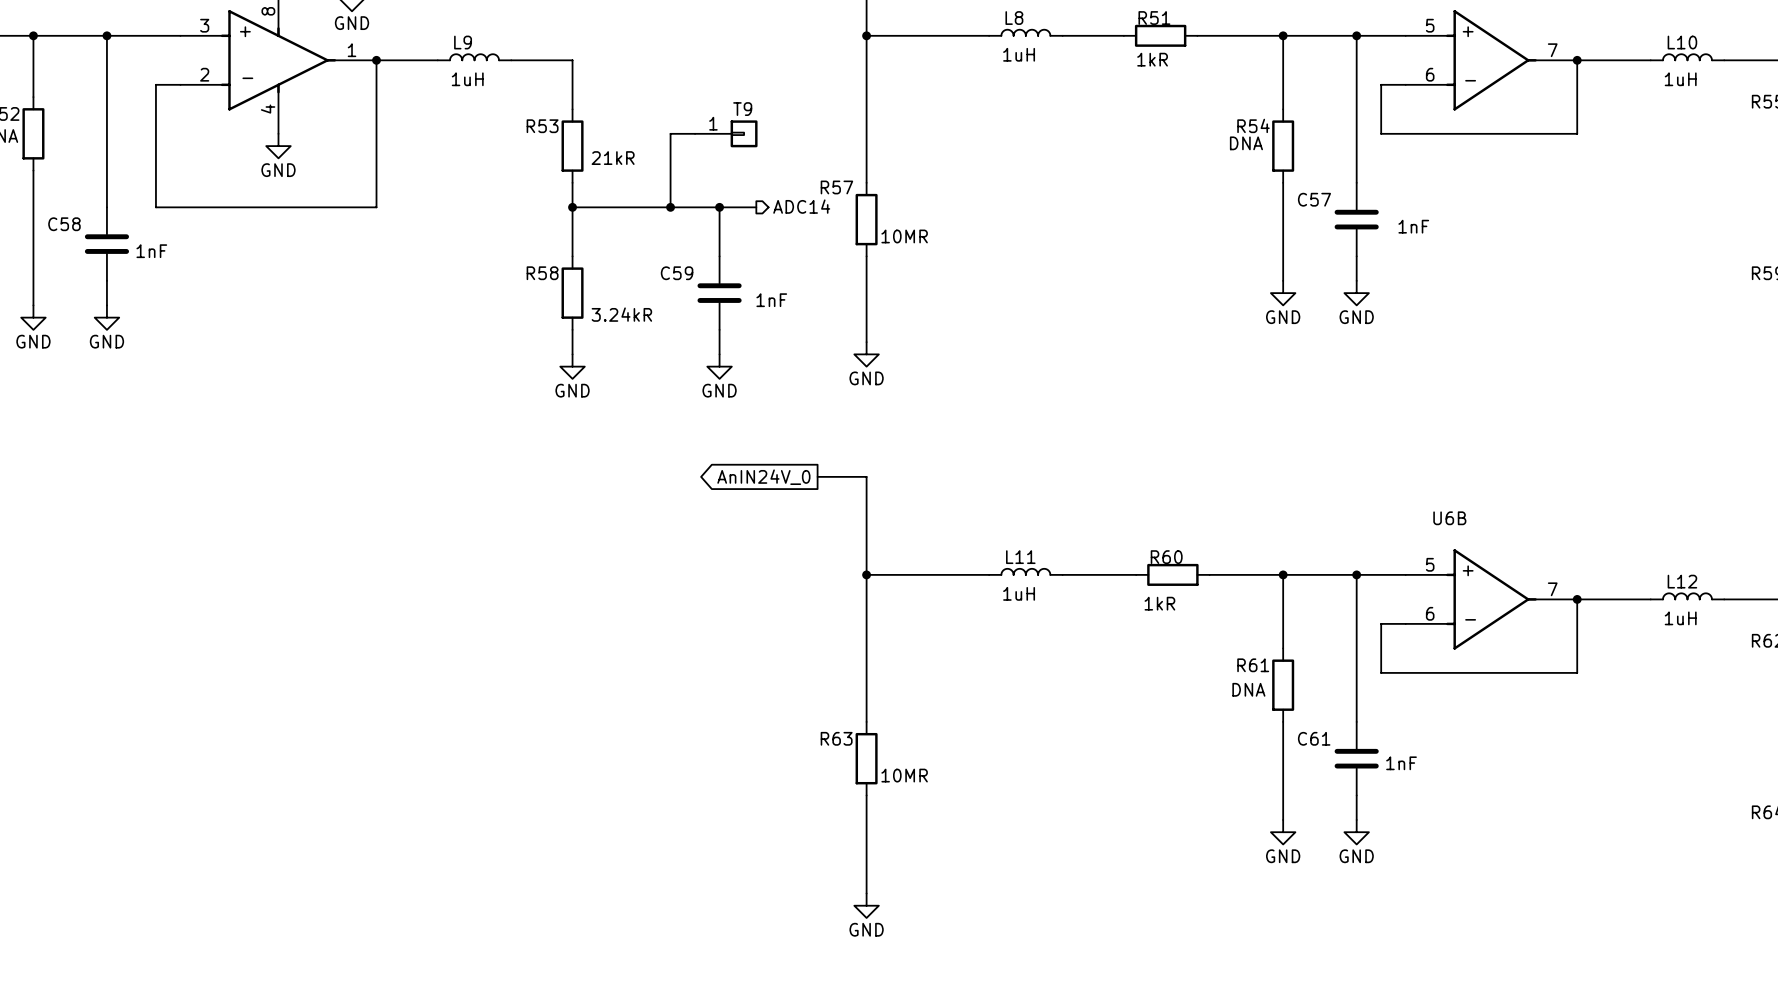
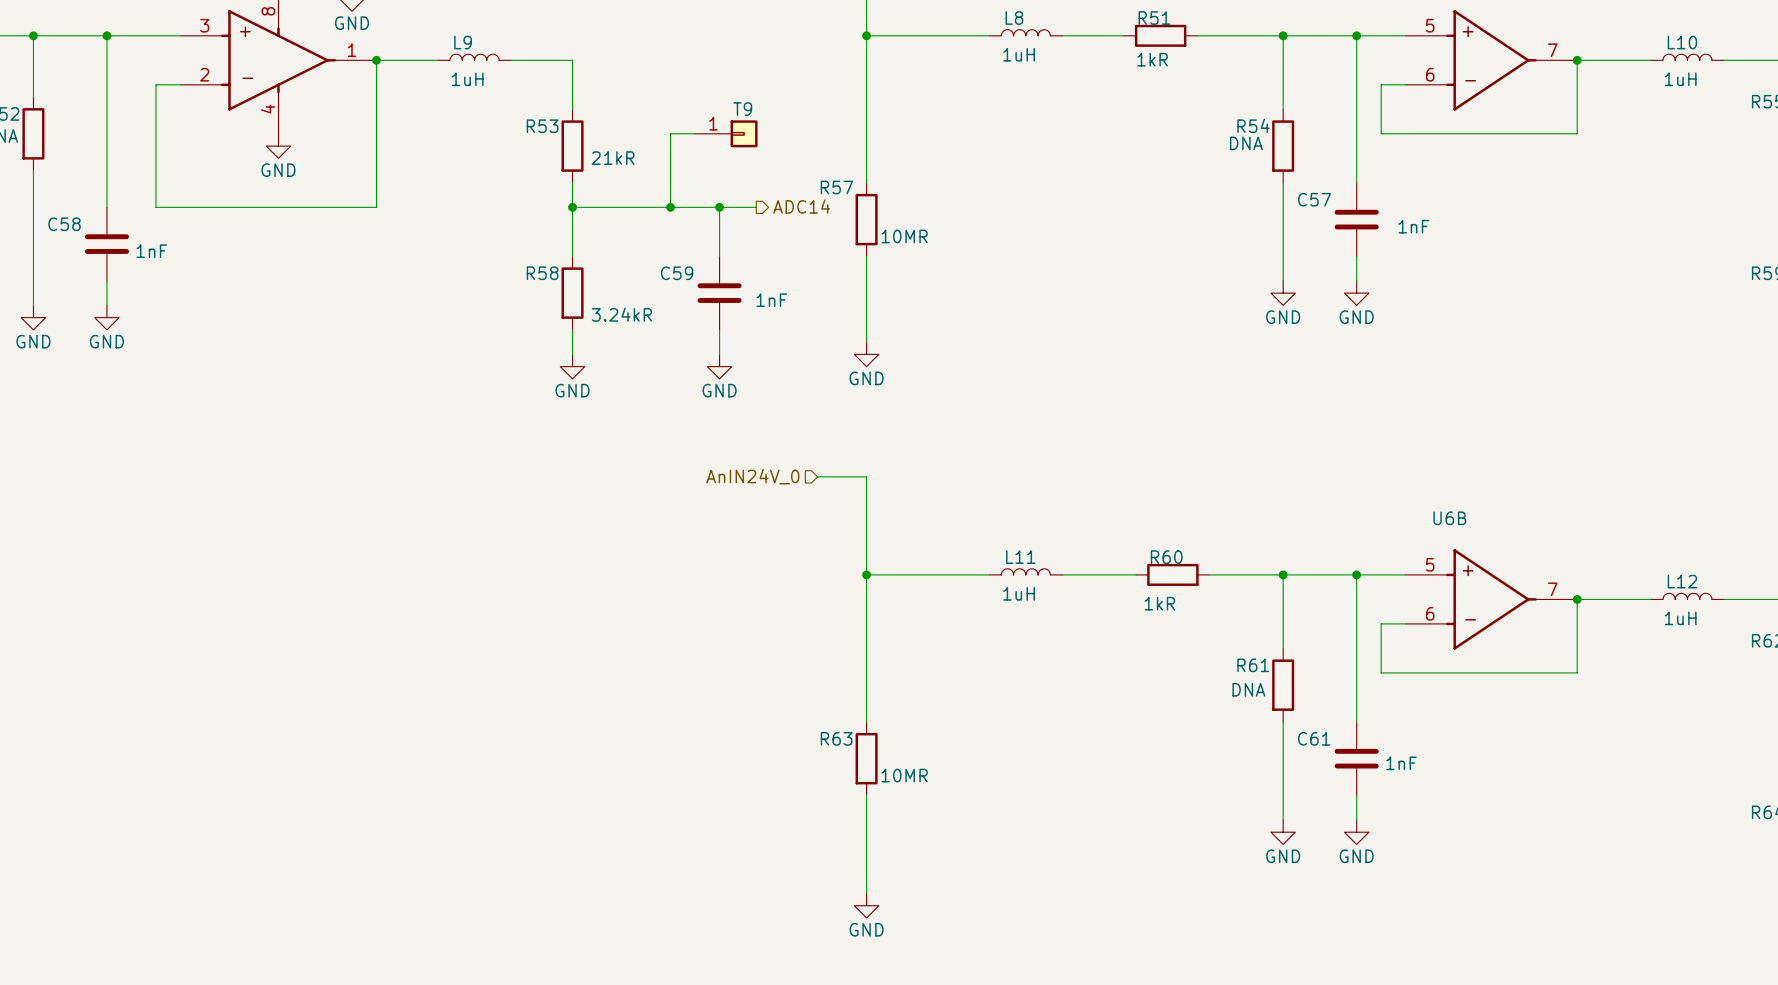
hierarchical label: none -> AnIN24V_0 (752, 476)
global label: AnIN24V_0 (763, 477) -> none

